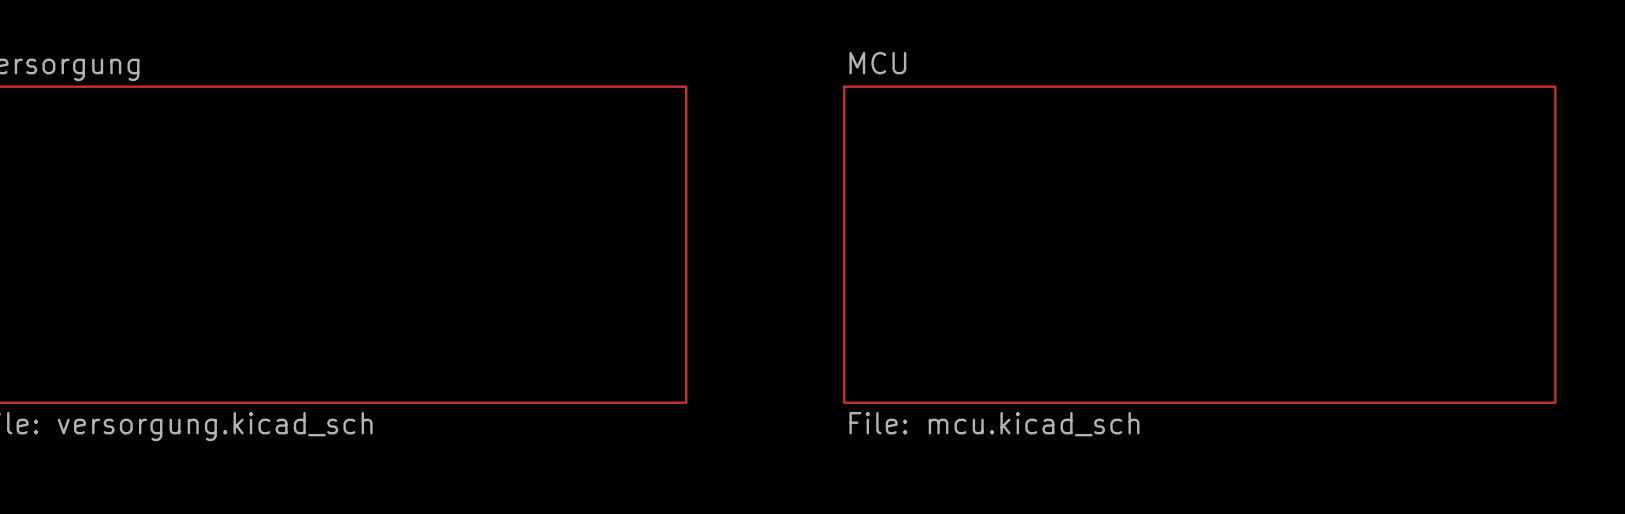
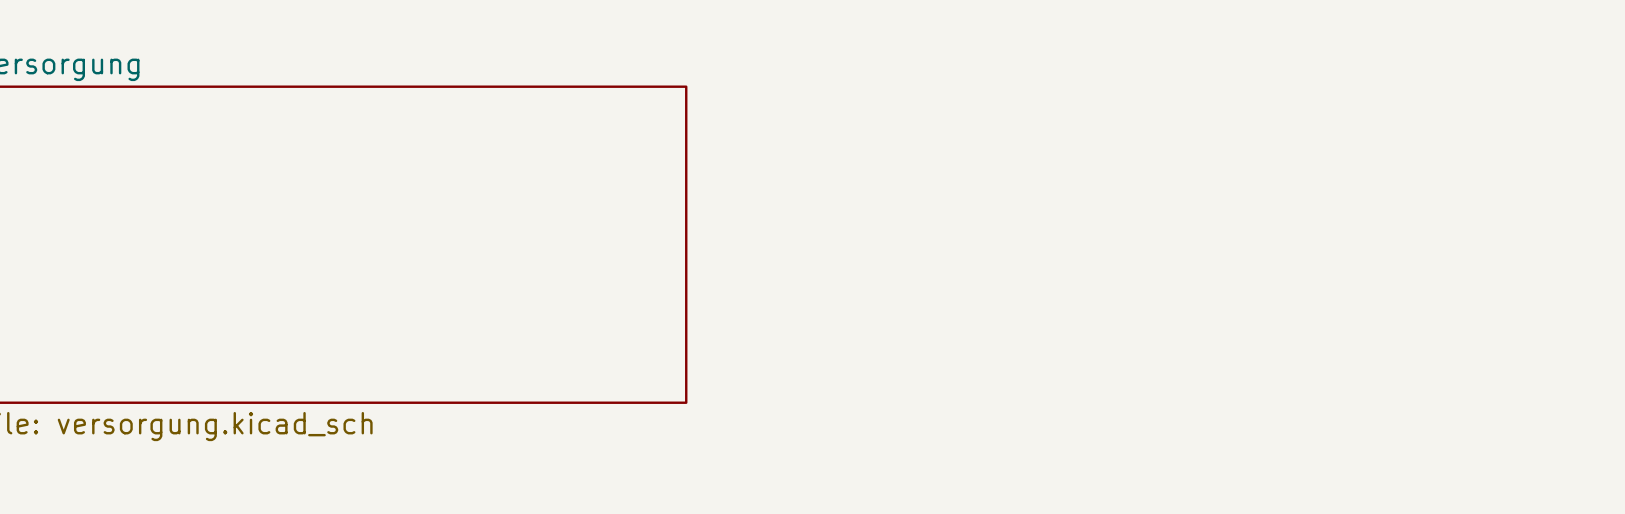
sheet MCU: File: mcu.kicad_sch (1199, 244) -> none

